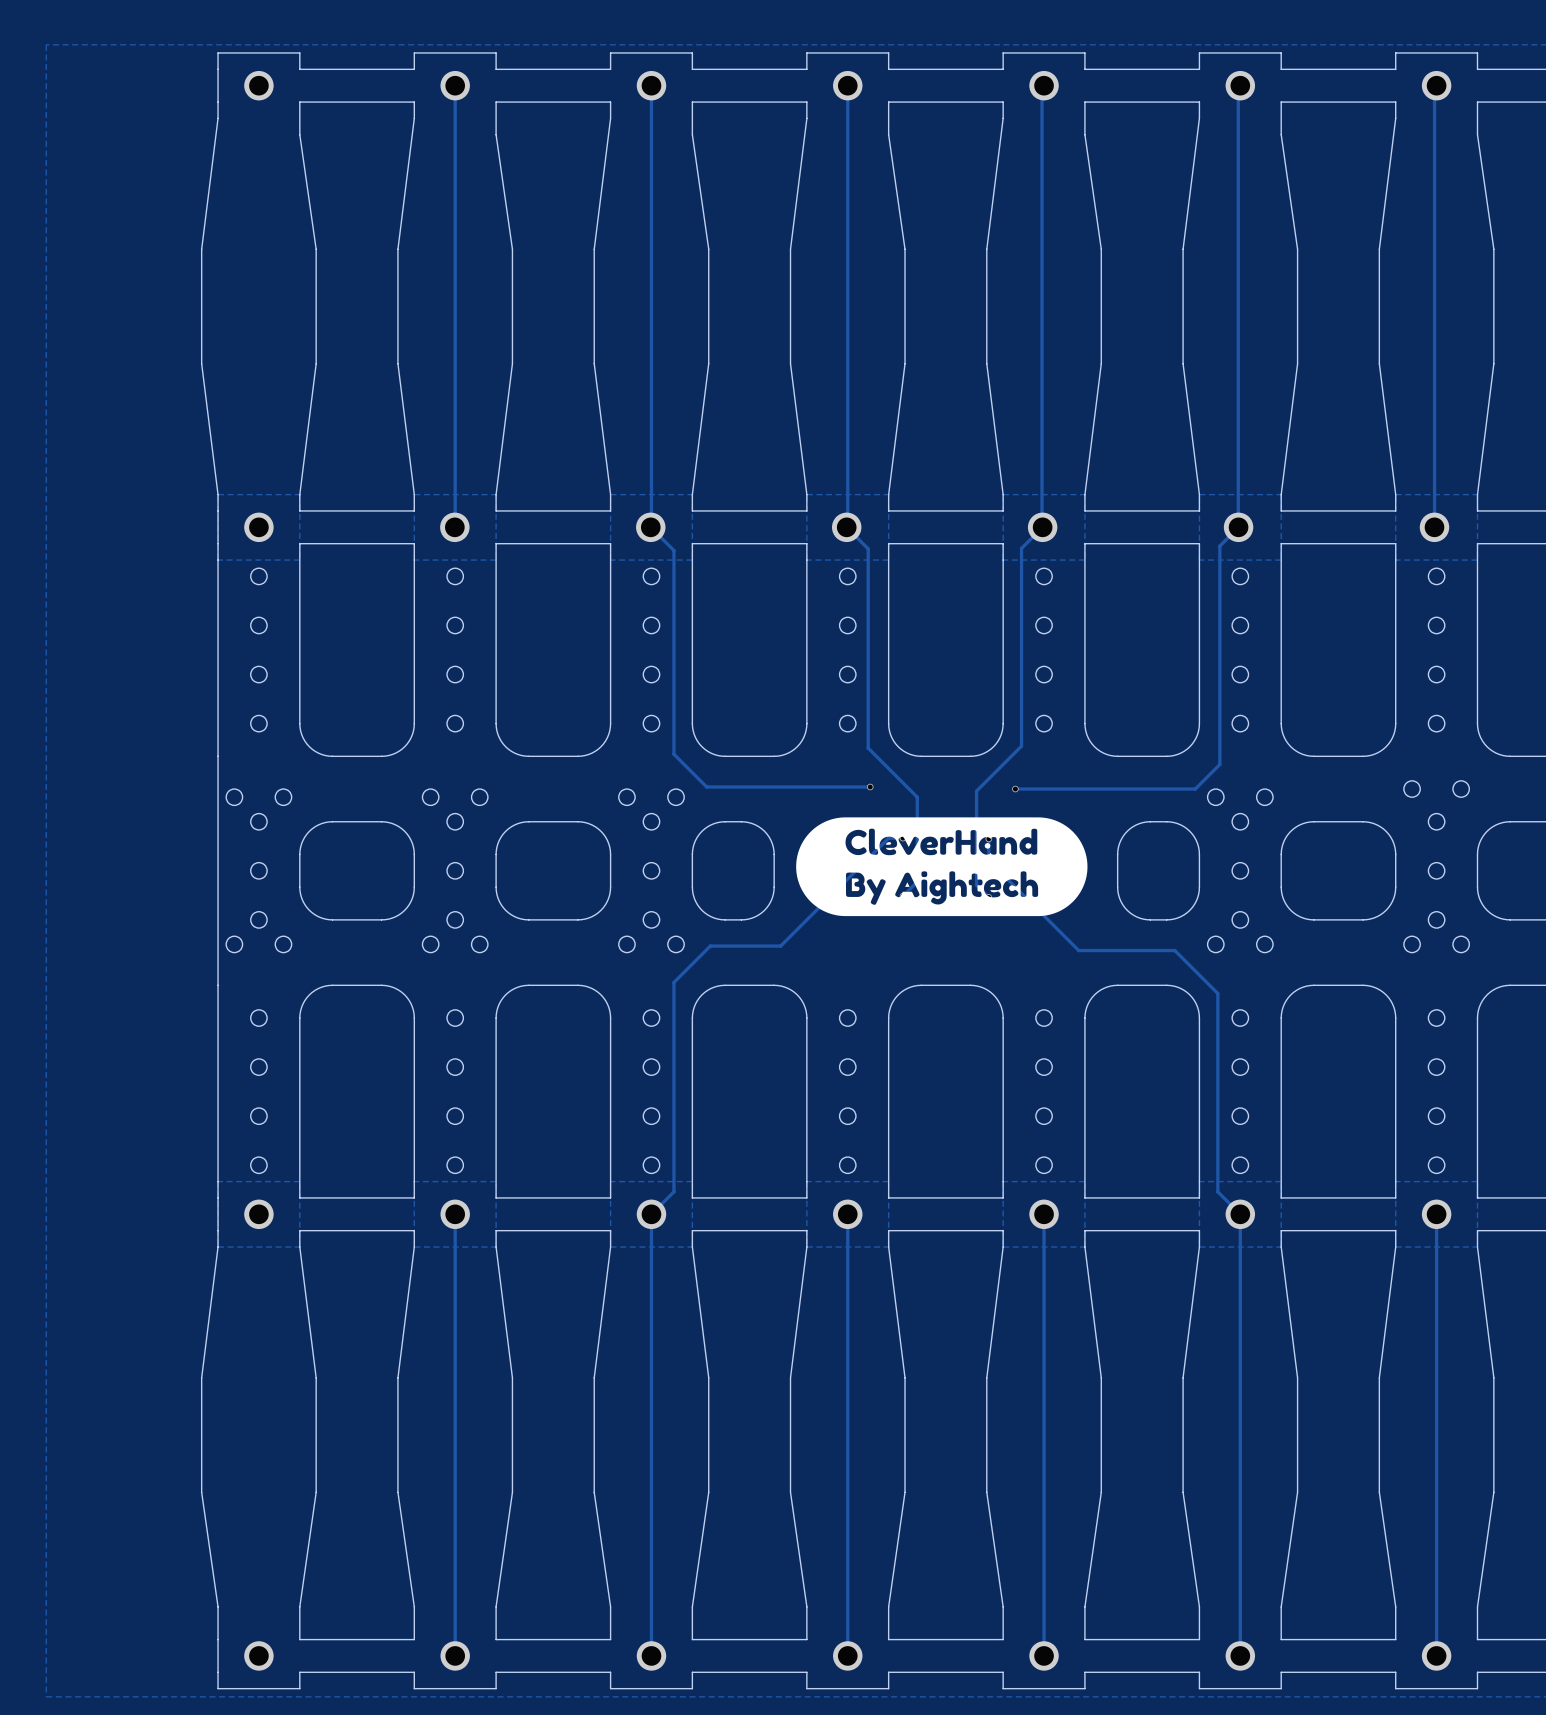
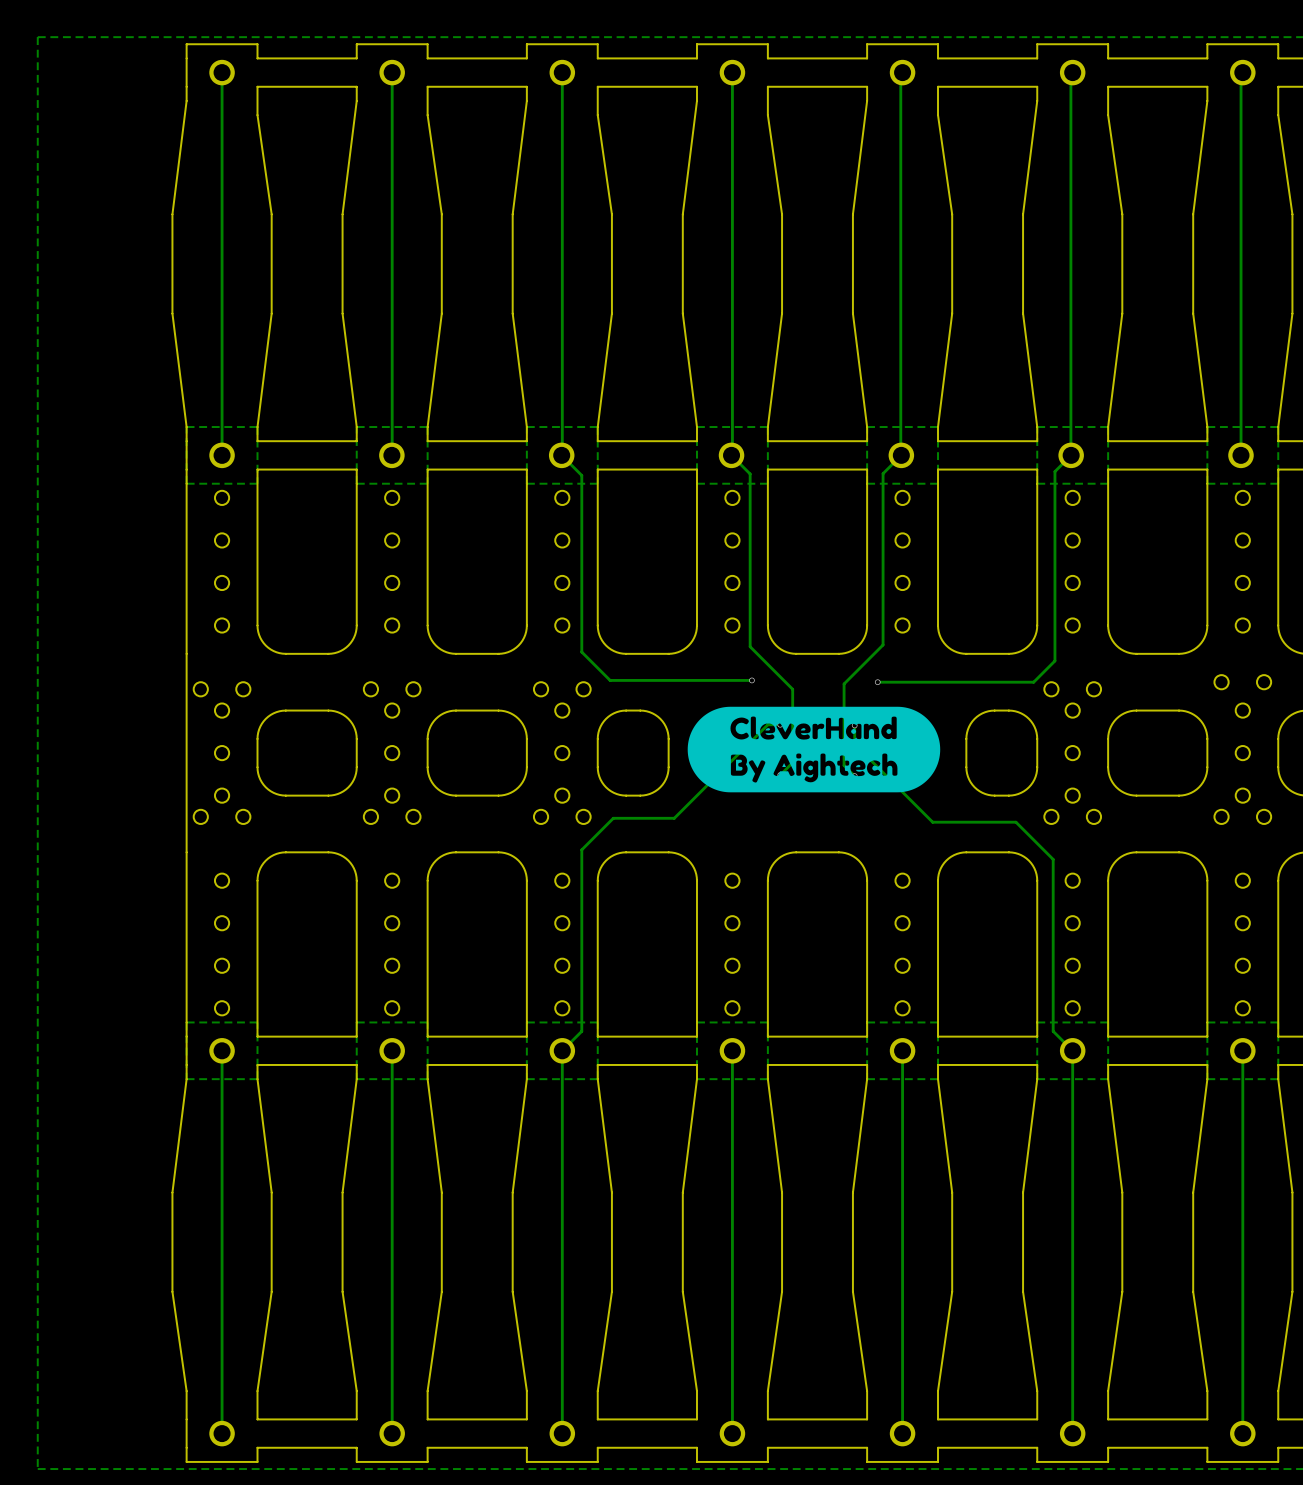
track: none -> (222, 72) (222, 455)
track: none -> (222, 1050) (222, 1433)

